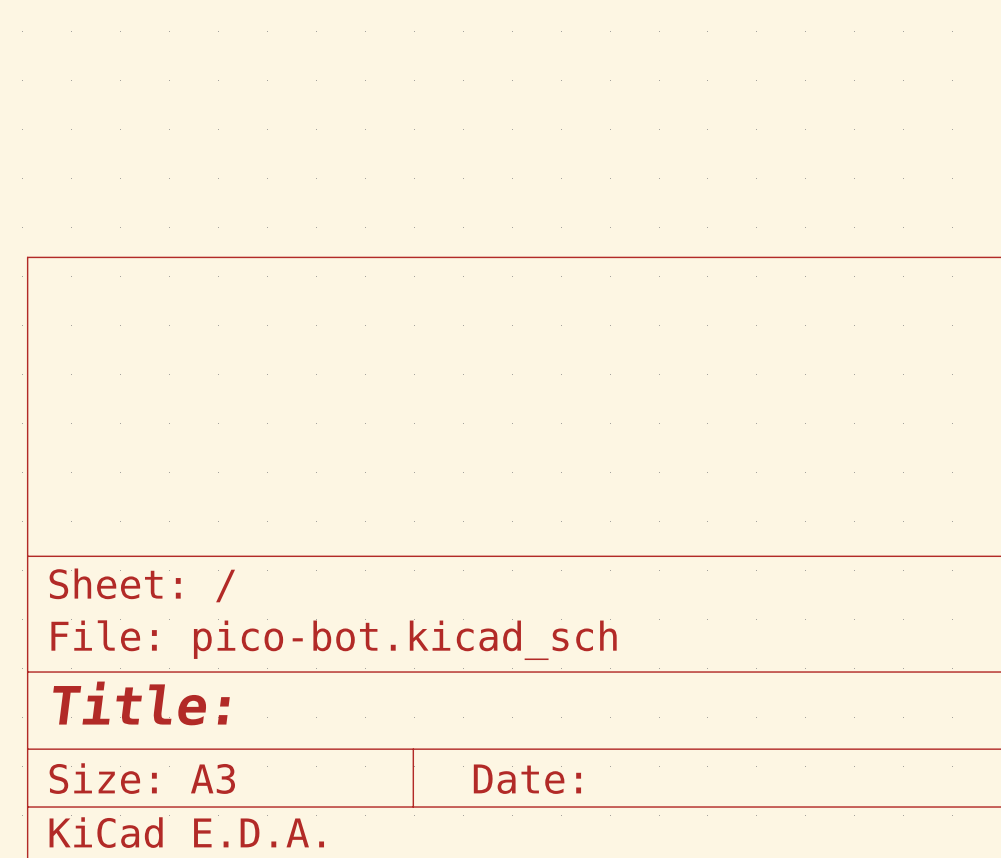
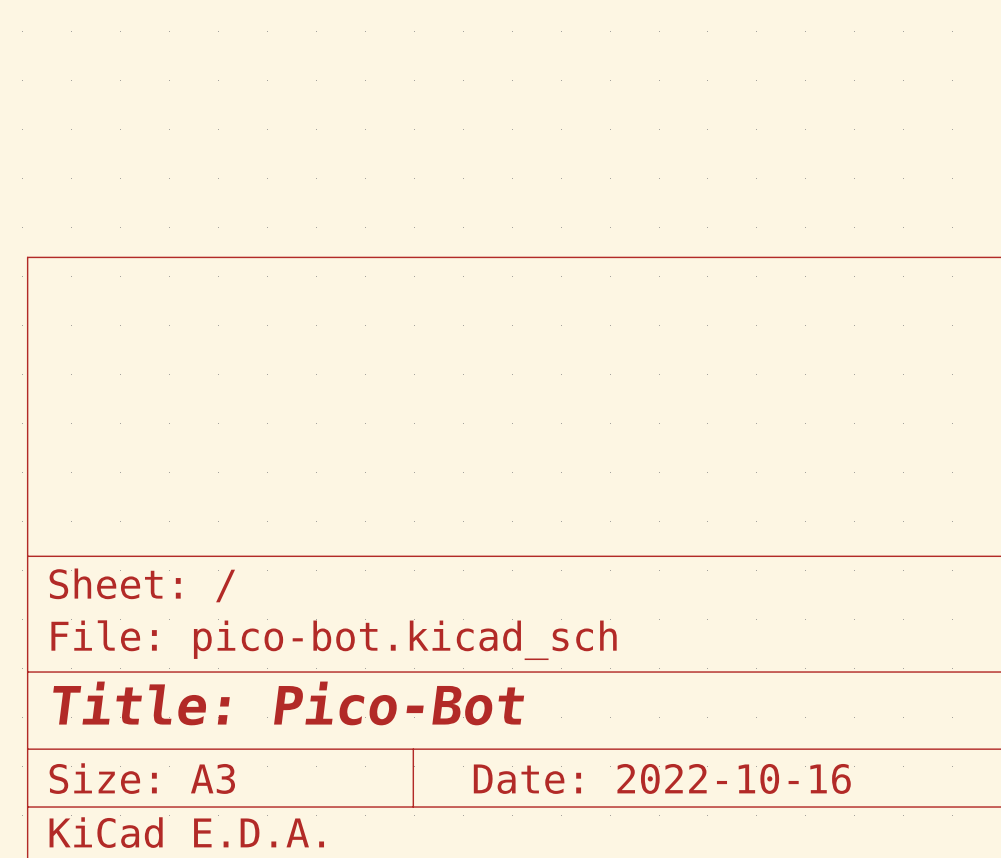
title block: Title: (141, 703) -> Title: Pico-Bot (288, 703)
title block: Date: (527, 779) -> Date: 2022-10-16 (662, 778)

